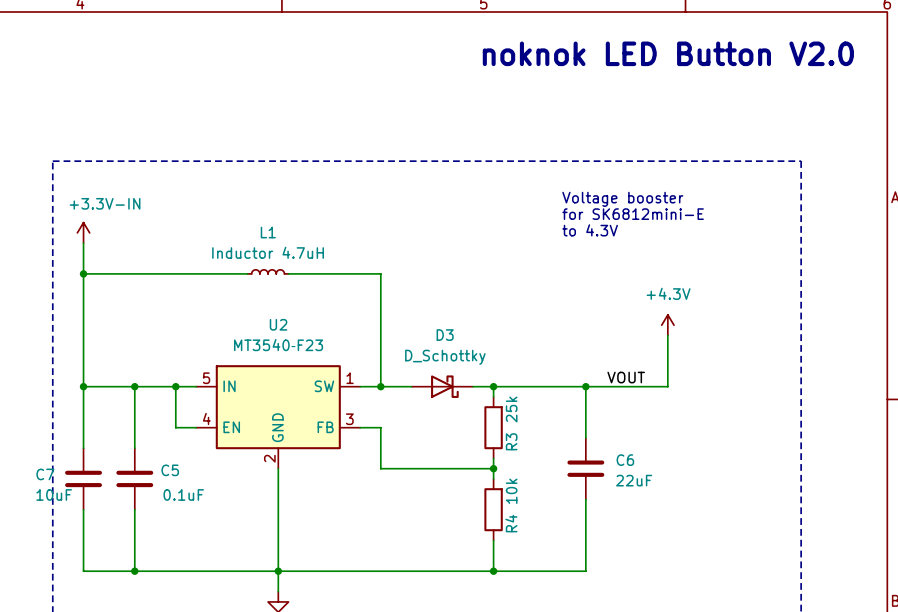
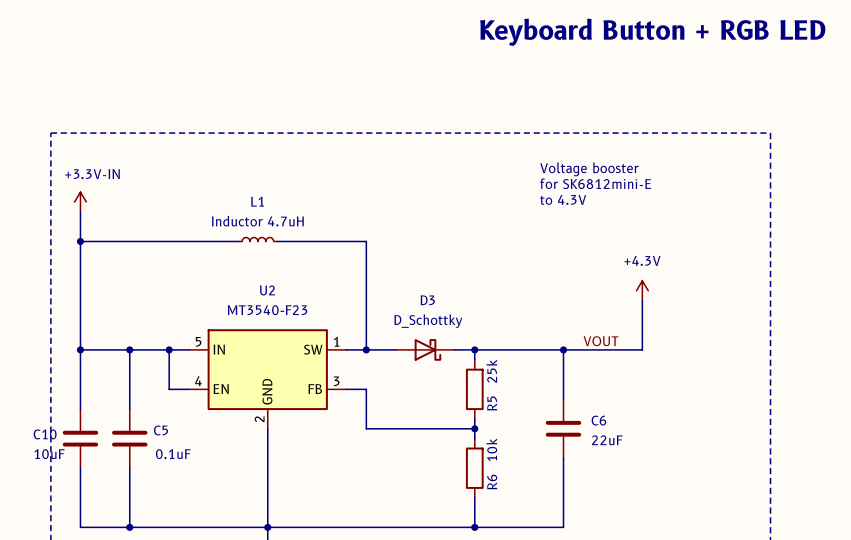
text: noknok LED Button V2.0 (668, 53) -> Keyboard Button + RGB LED (652, 32)
R3 name: R3 (511, 441) -> R5 (492, 403)
C7 name: C7 (45, 474) -> C10 (45, 434)
R4 name: R4 (511, 523) -> R6 (492, 482)

